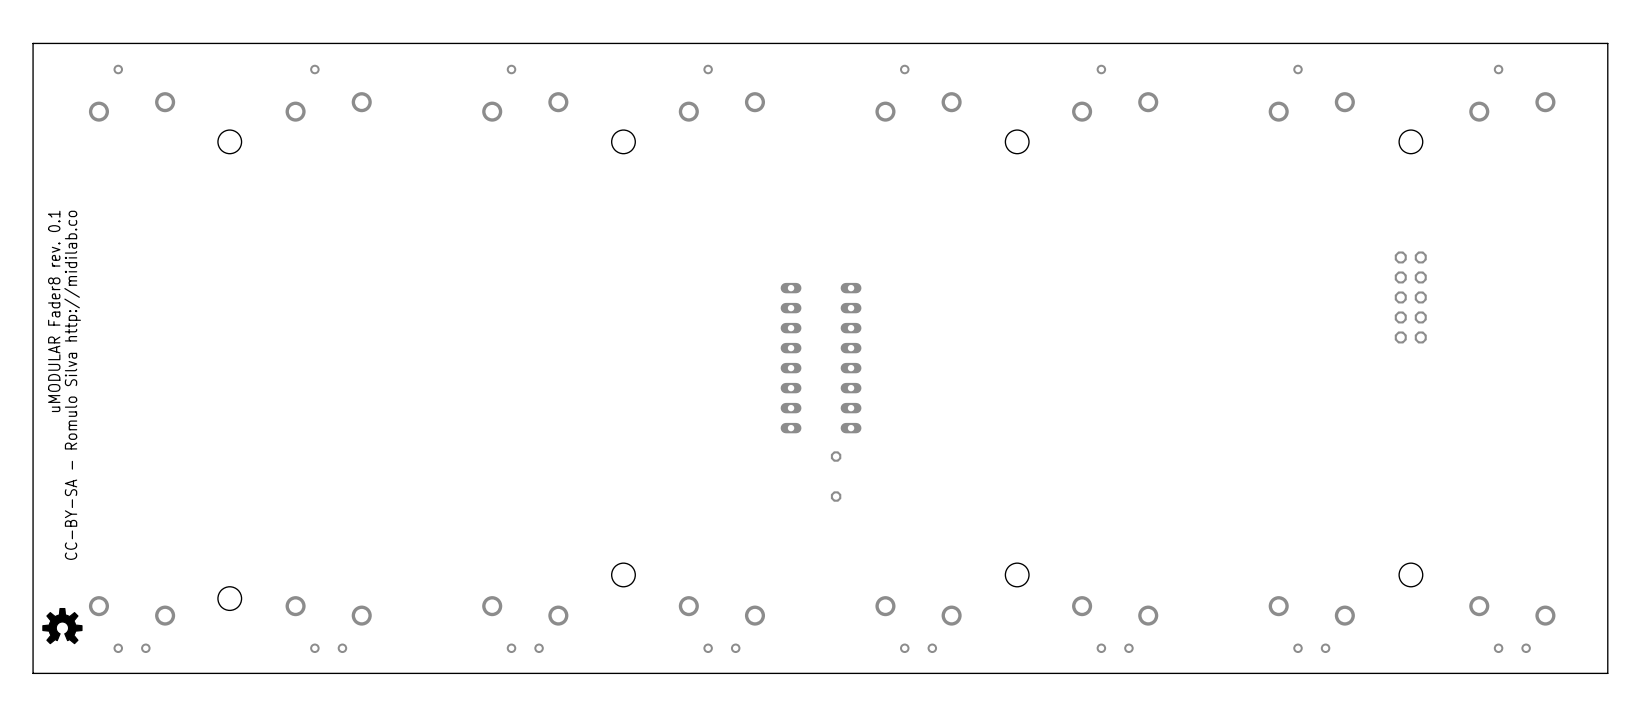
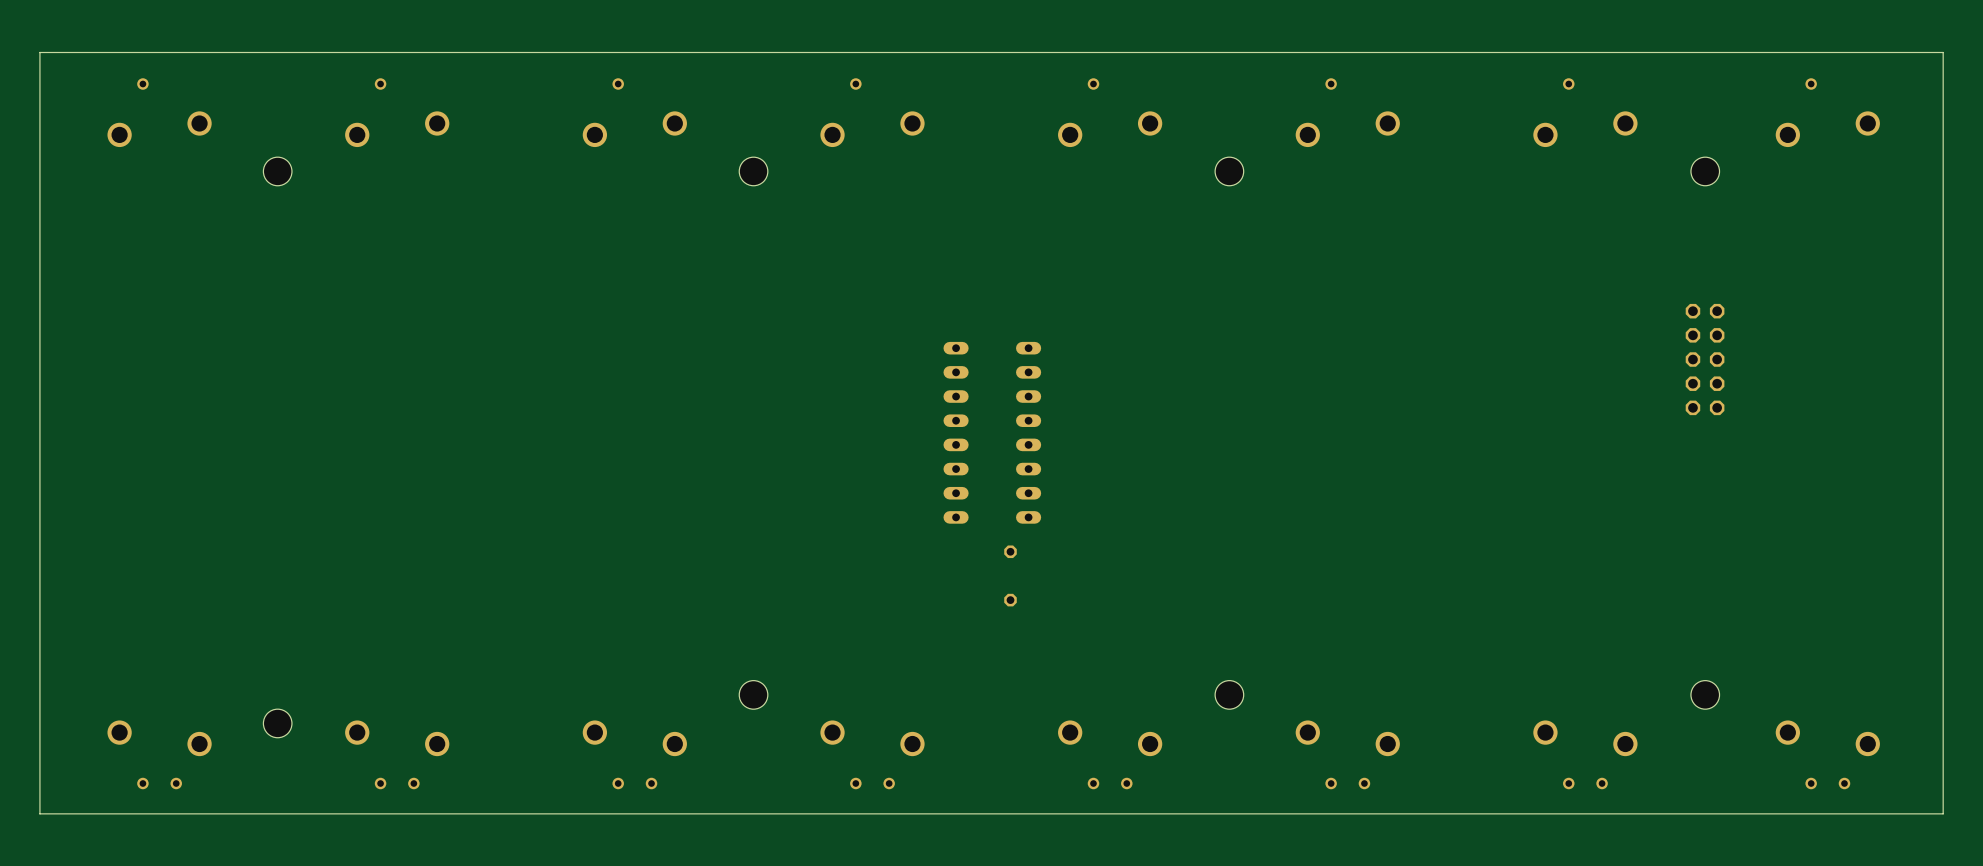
text: uMODULAR Fader8 rev. 0.1 (54, 311) -> none
text: CC-BY-SA - Romulo Silva http://midilab.co (72, 385) -> none
drawing: [42, 607, 83, 645] -> none

